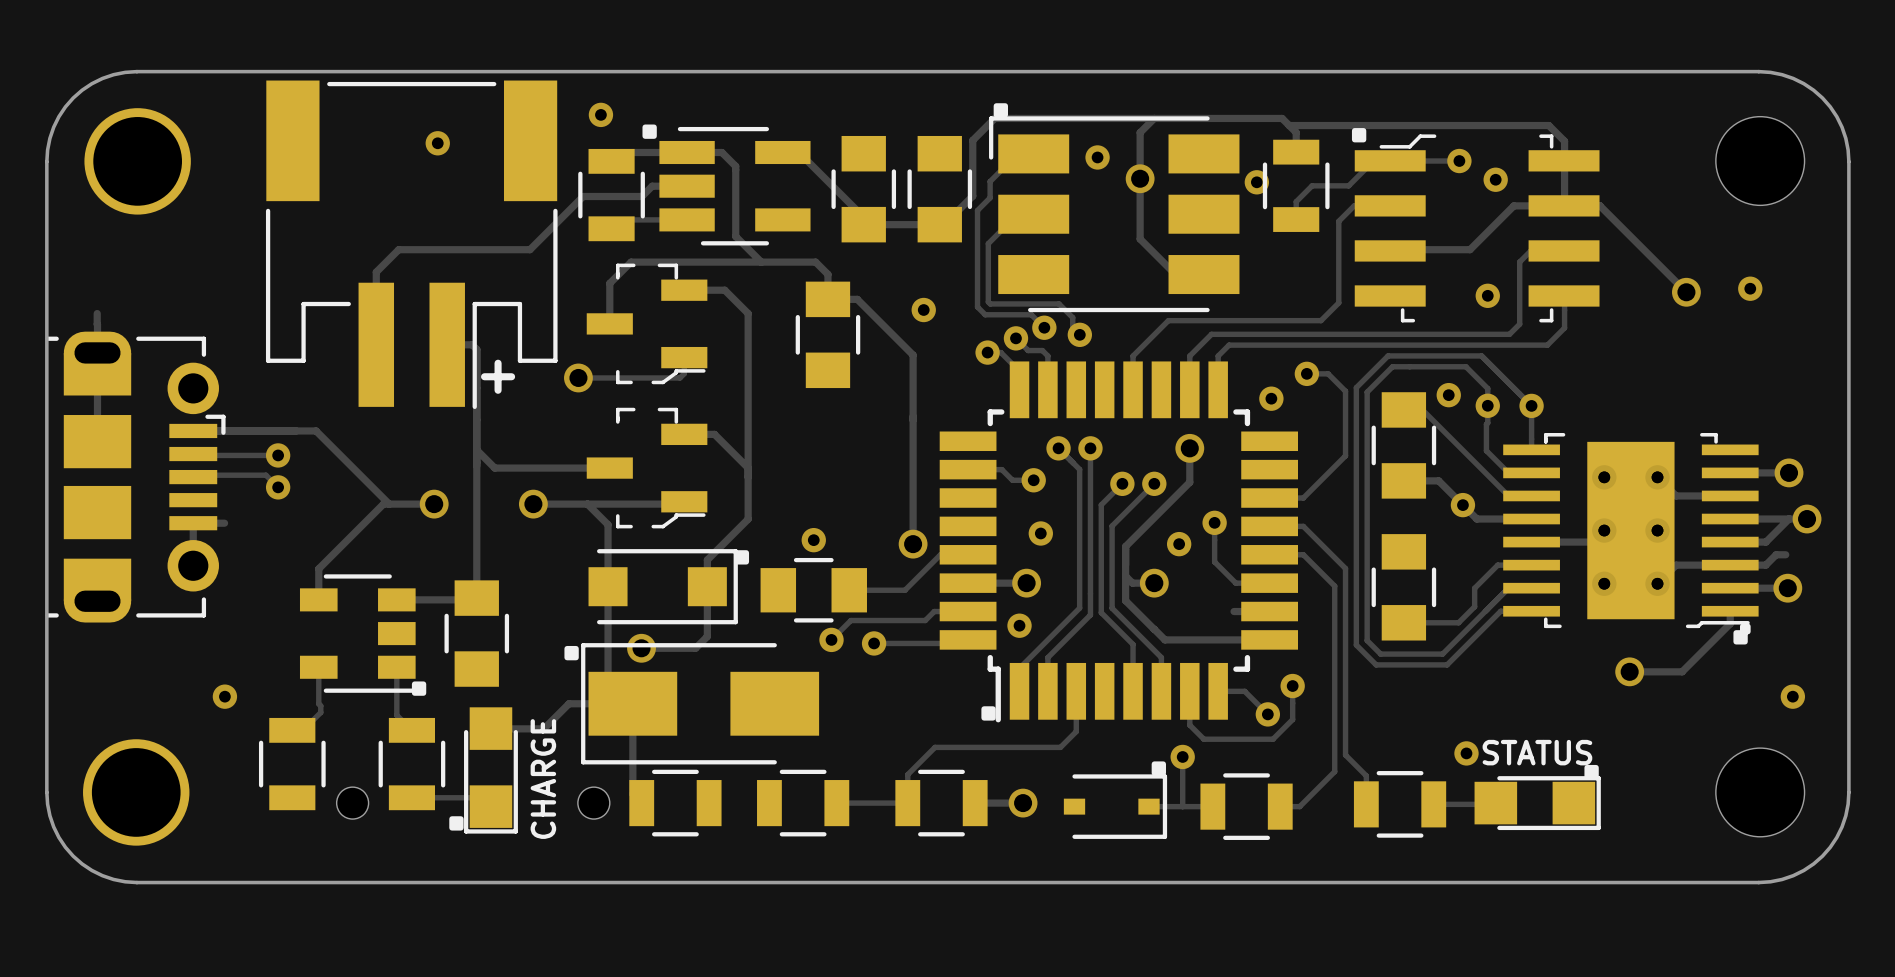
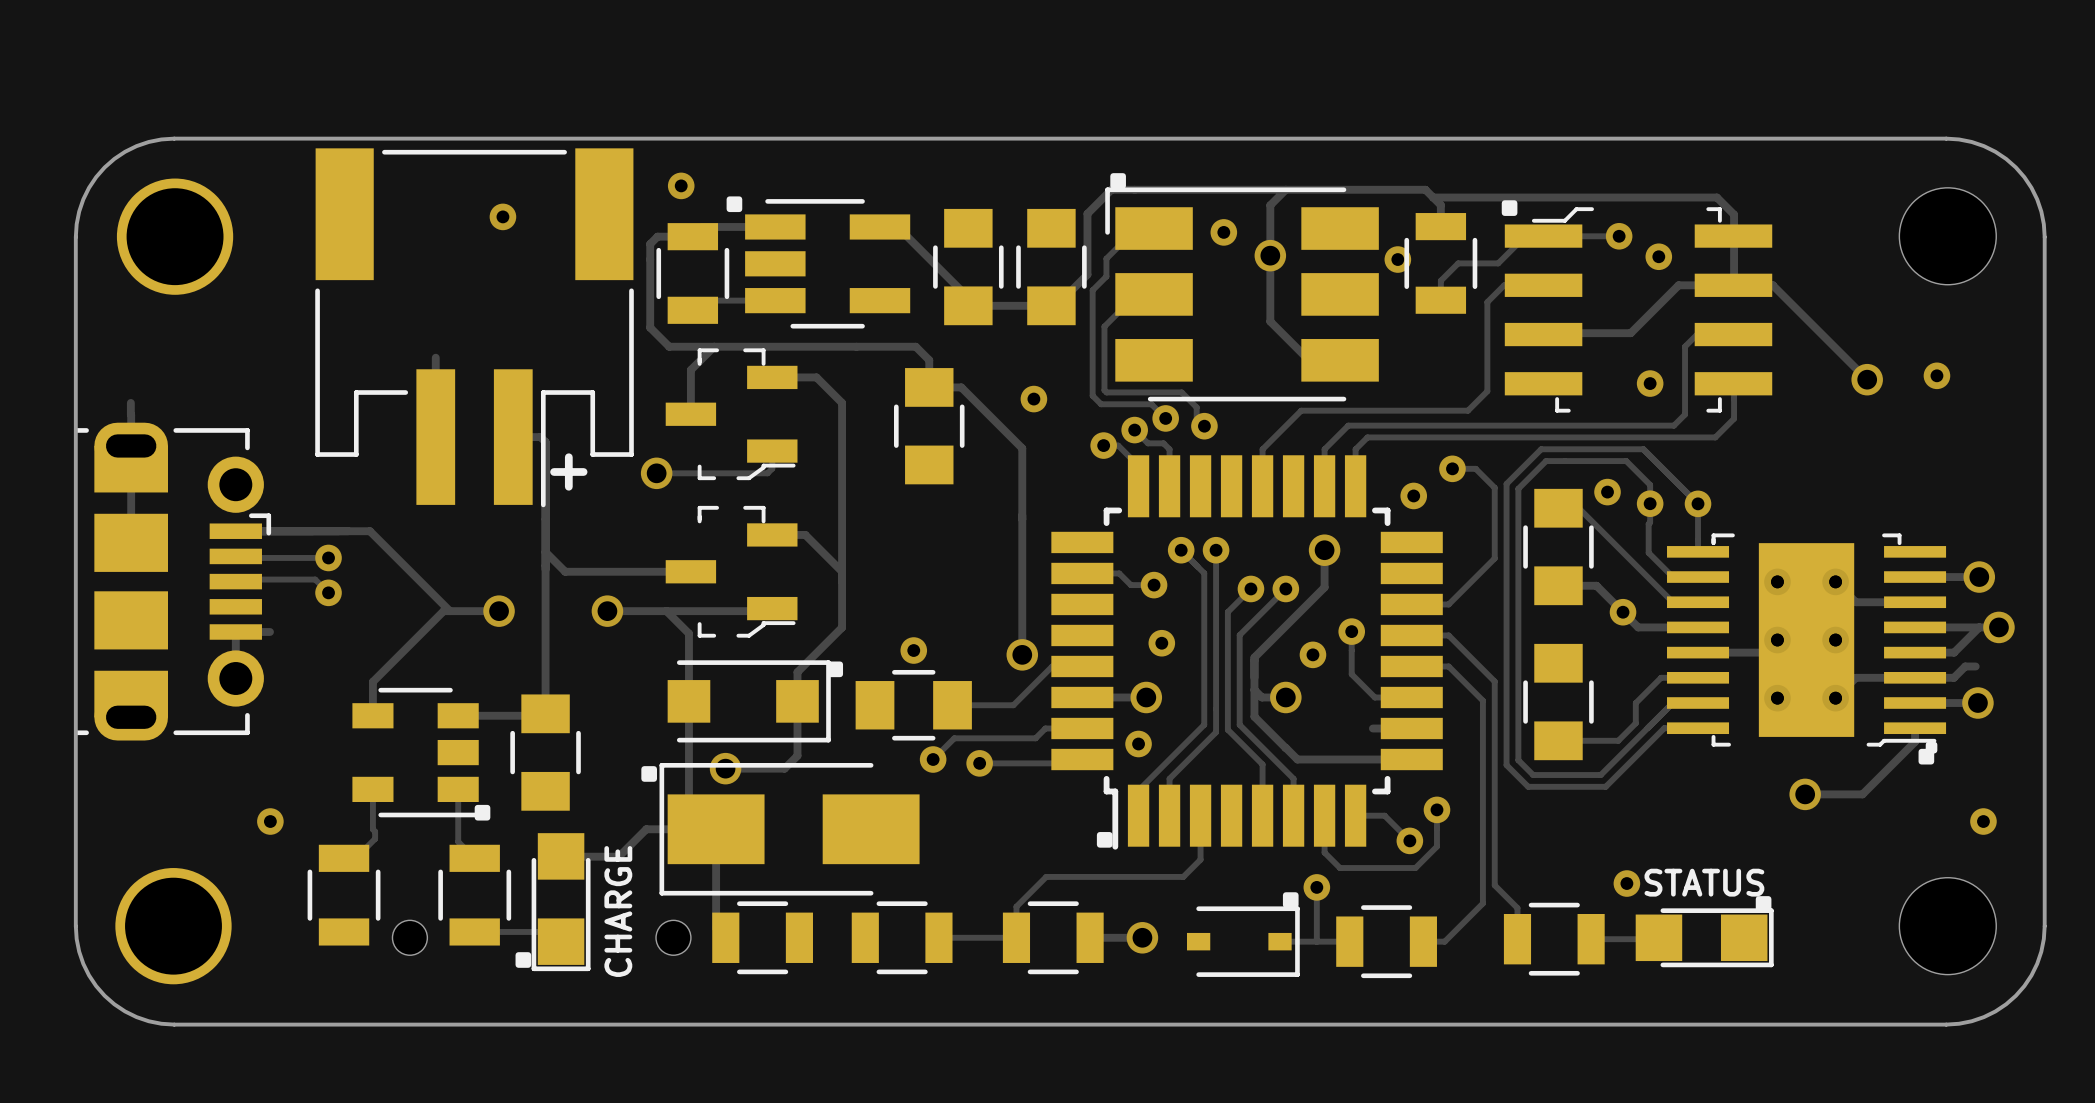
track: (687, 152) (721, 152) (735, 166) (735, 236) (761, 262) -> none
track: none -> (692, 236) (657, 236) (650, 244) (650, 327) (669, 346) (714, 346)
track: (687, 186) (652, 186) (641, 196) (583, 196) (529, 249) (398, 249) (376, 272) -> none

